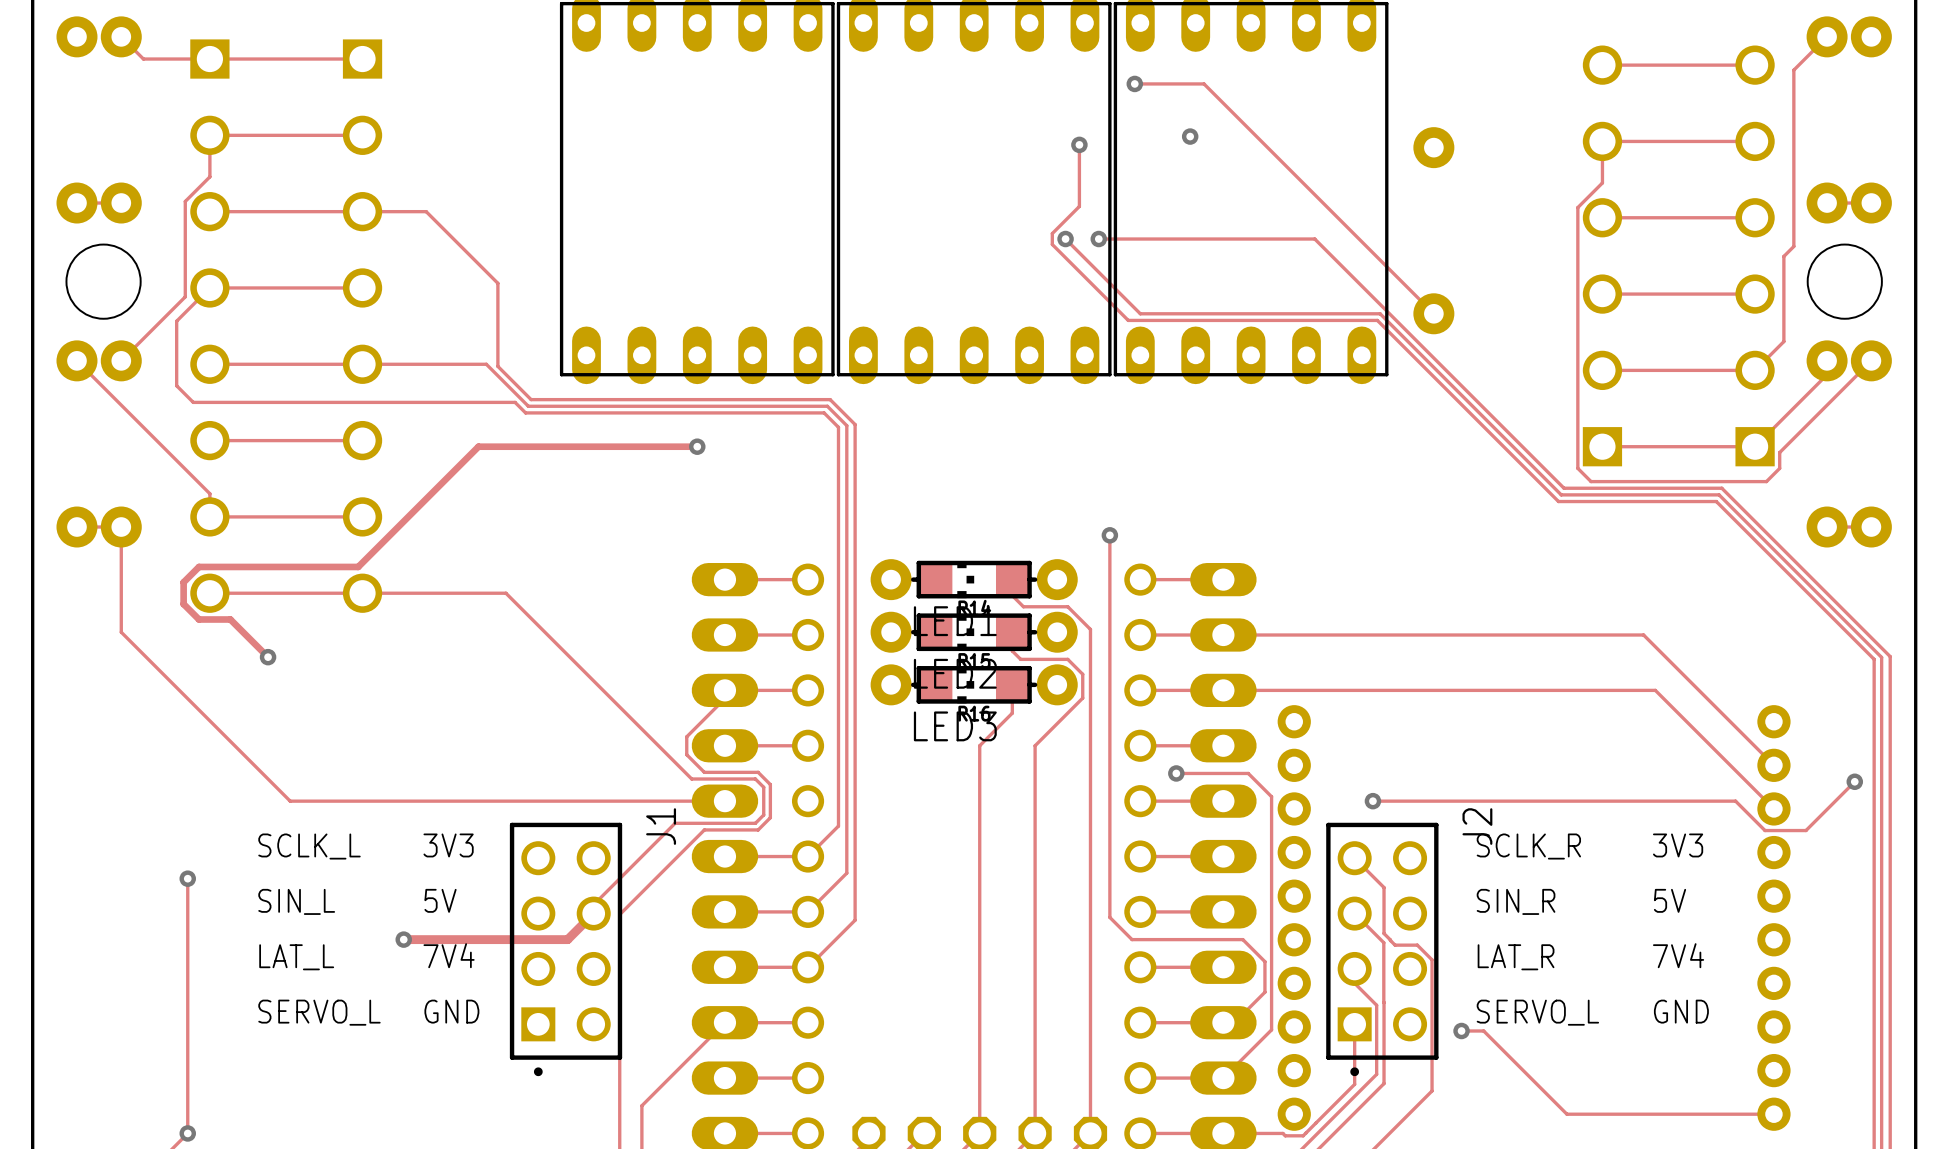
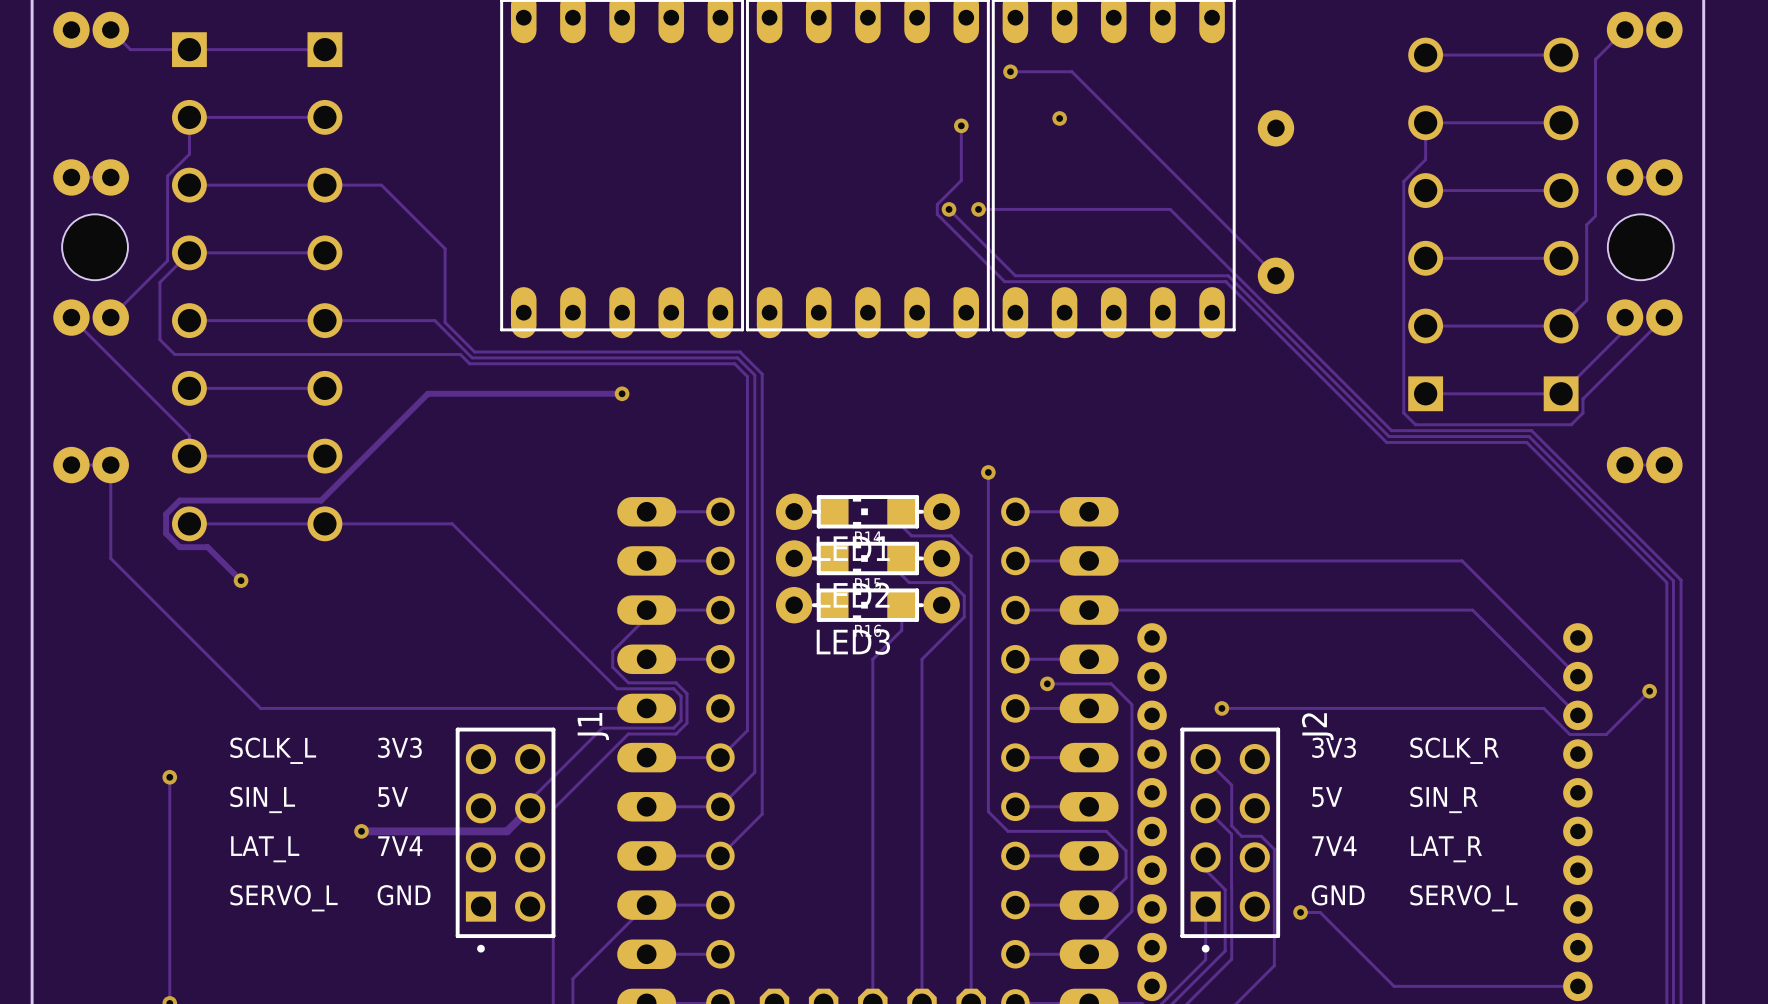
text: 3V3 (1678, 845) -> none
text: SCLK_R (1528, 846) -> 3V3 (1334, 747)
text: none -> SCLK_R (1454, 750)
text: 5V (1670, 900) -> none
text: SIN_R (1516, 901) -> 5V (1327, 797)
text: none -> SIN_R (1444, 799)
text: 7V4 (1678, 955) -> none
text: LAT_R (1516, 957) -> 7V4 (1334, 846)
text: none -> LAT_R (1446, 849)
text: GND (1681, 1011) -> none
text: SERVO_L (1537, 1012) -> GND (1338, 895)
text: none -> SERVO_L (1463, 898)

